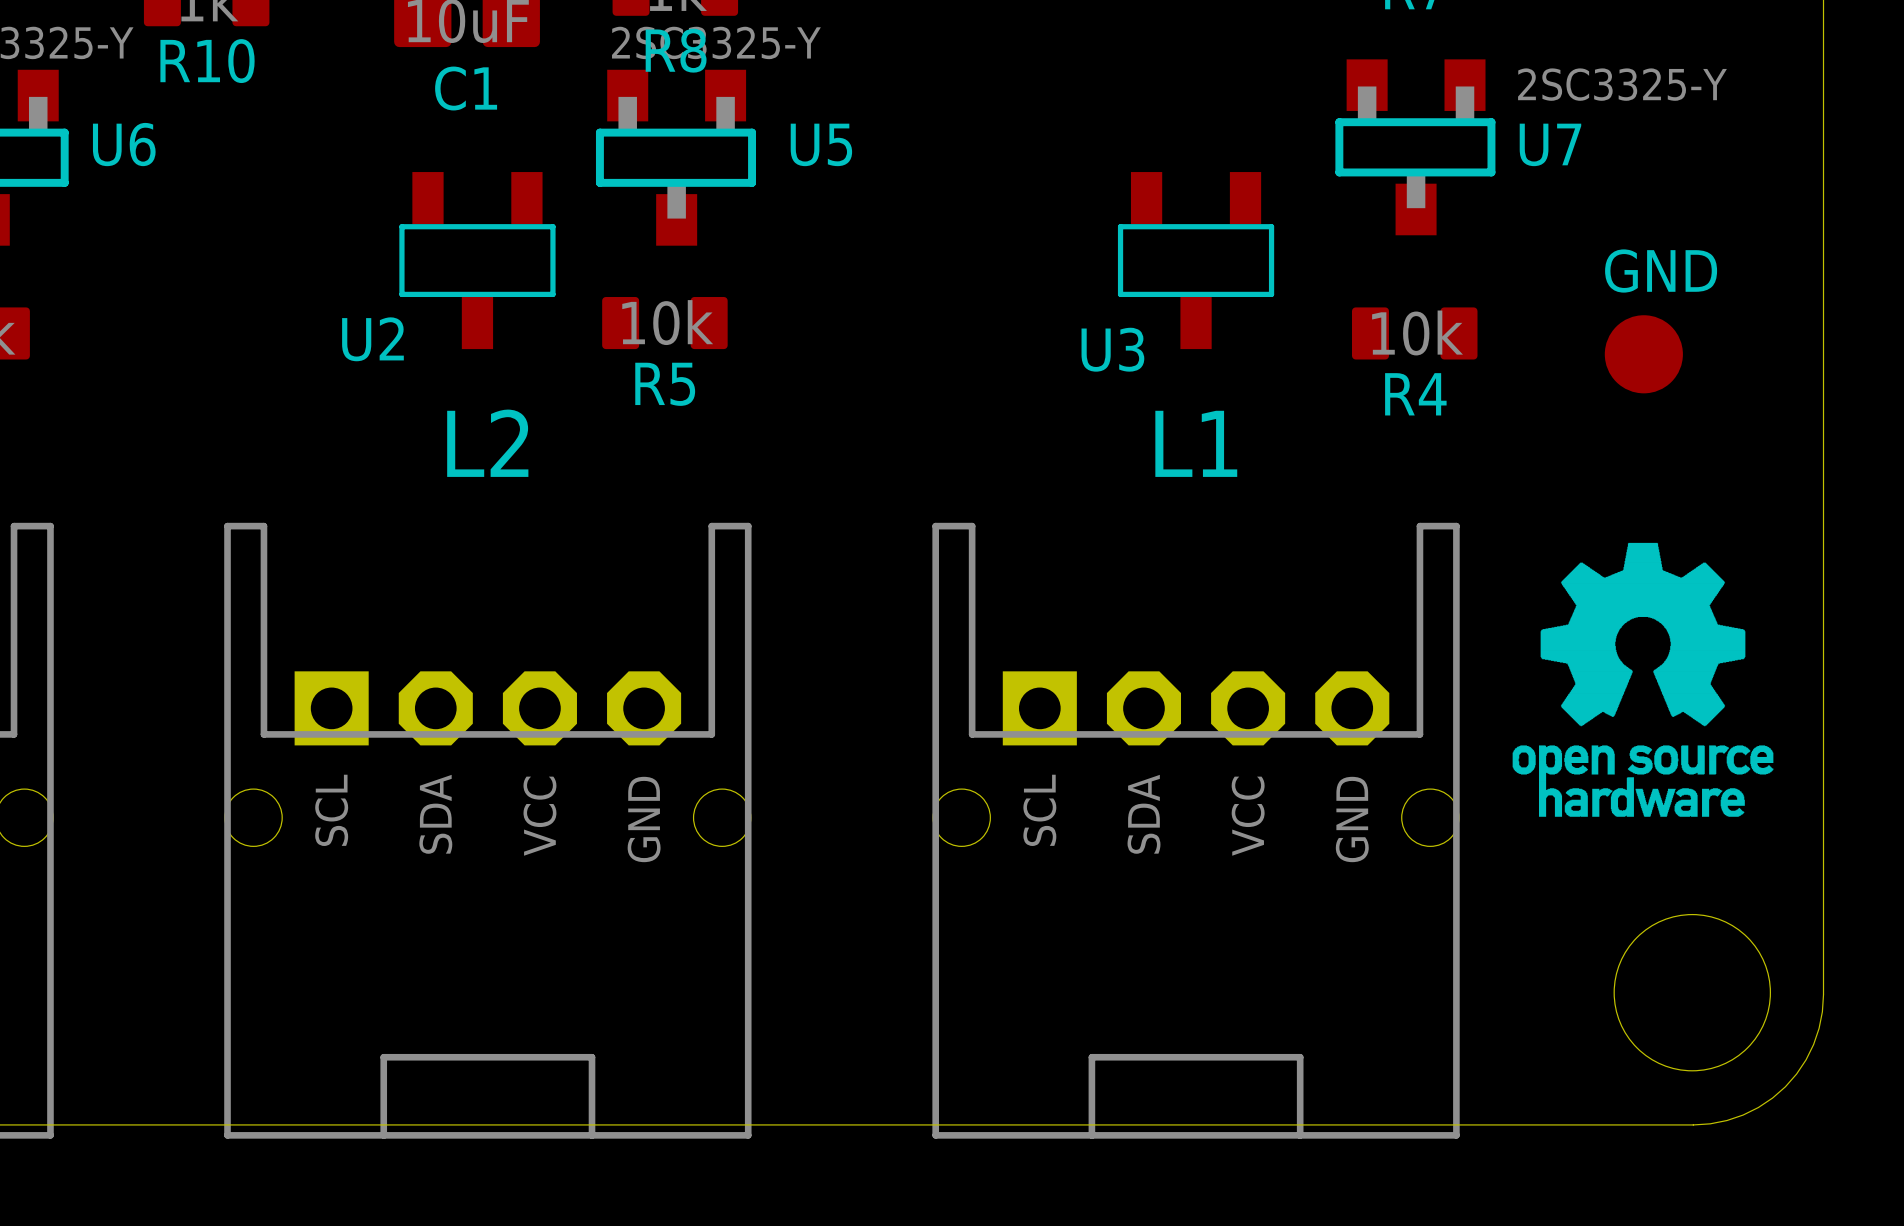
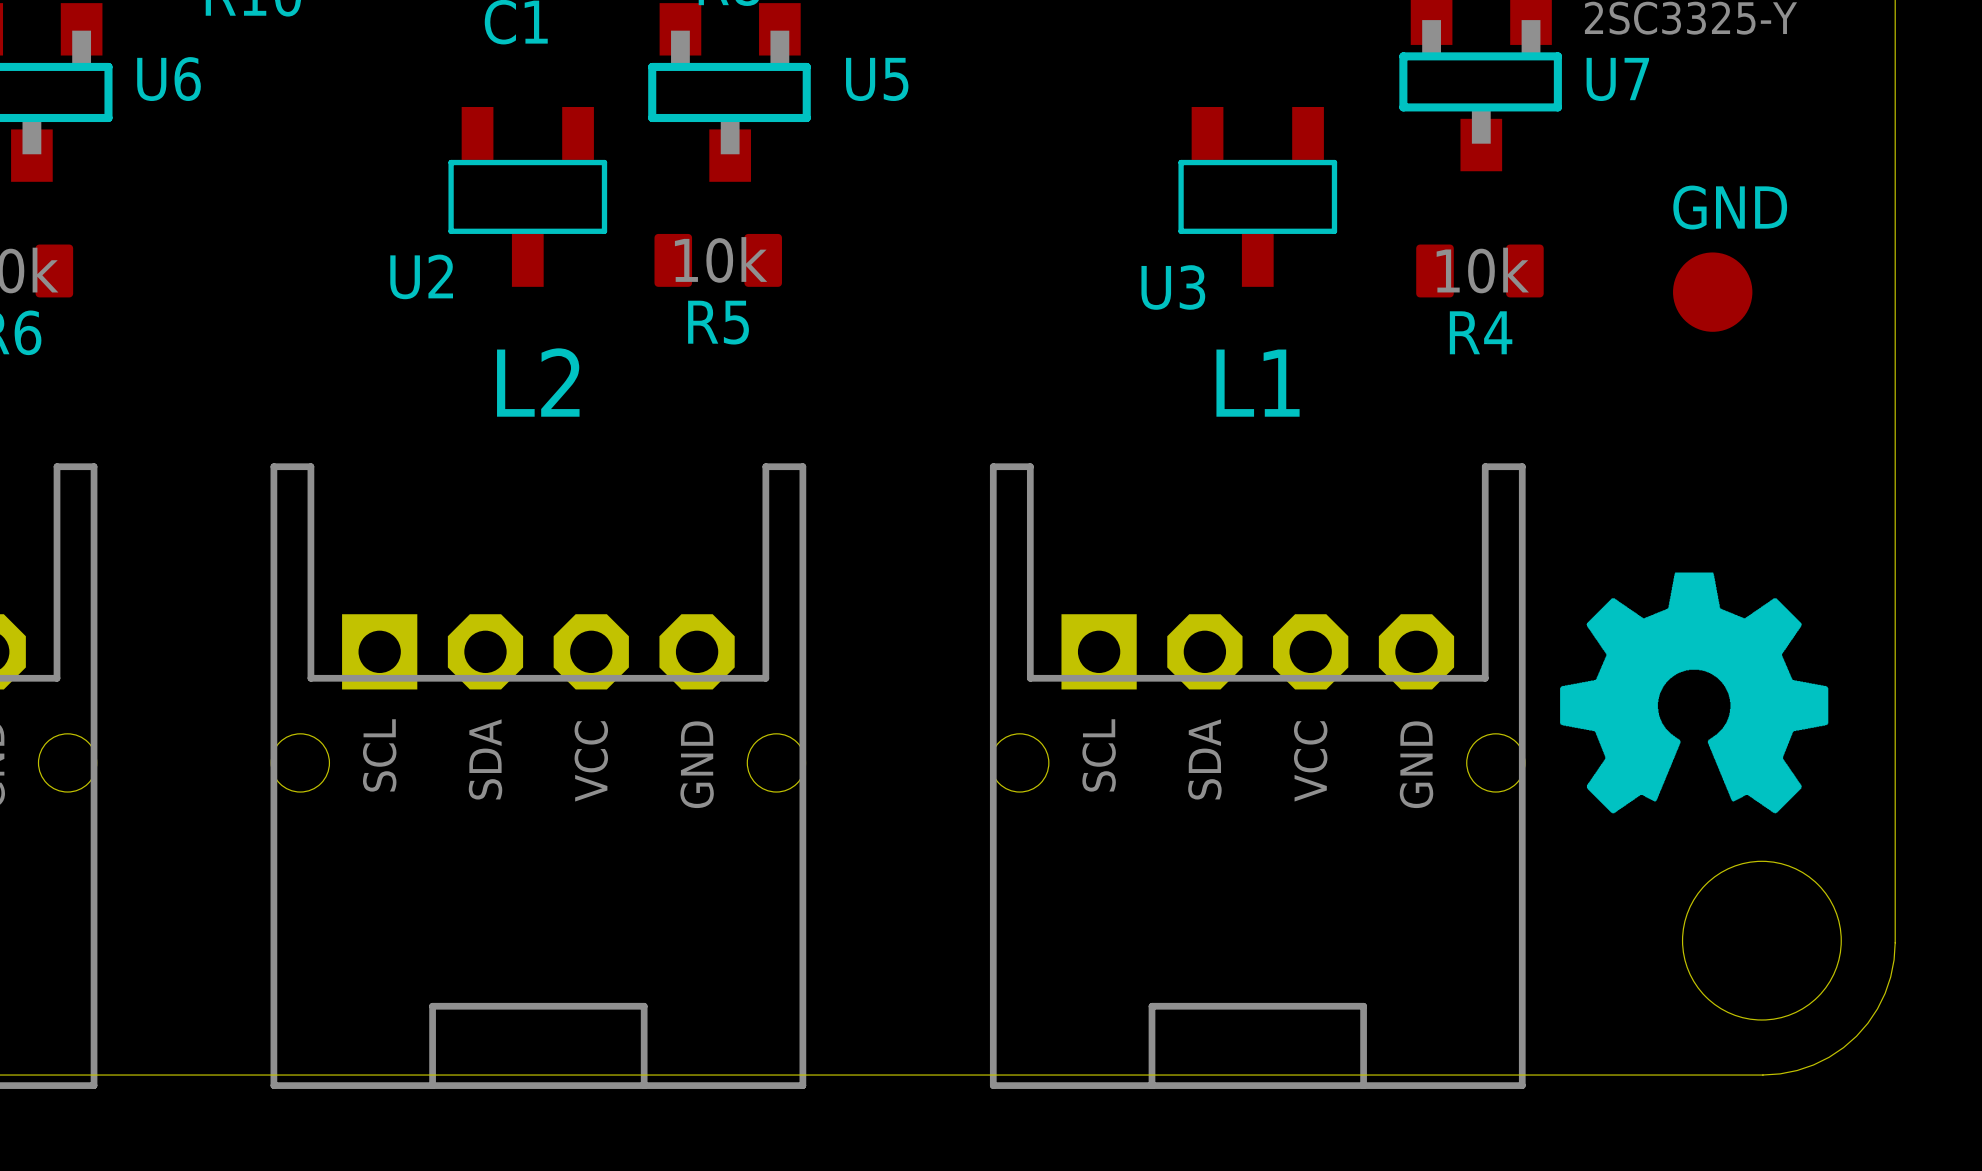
drawing: [1512, 542, 1774, 817] -> none
drawing: none -> [1560, 572, 1829, 814]

